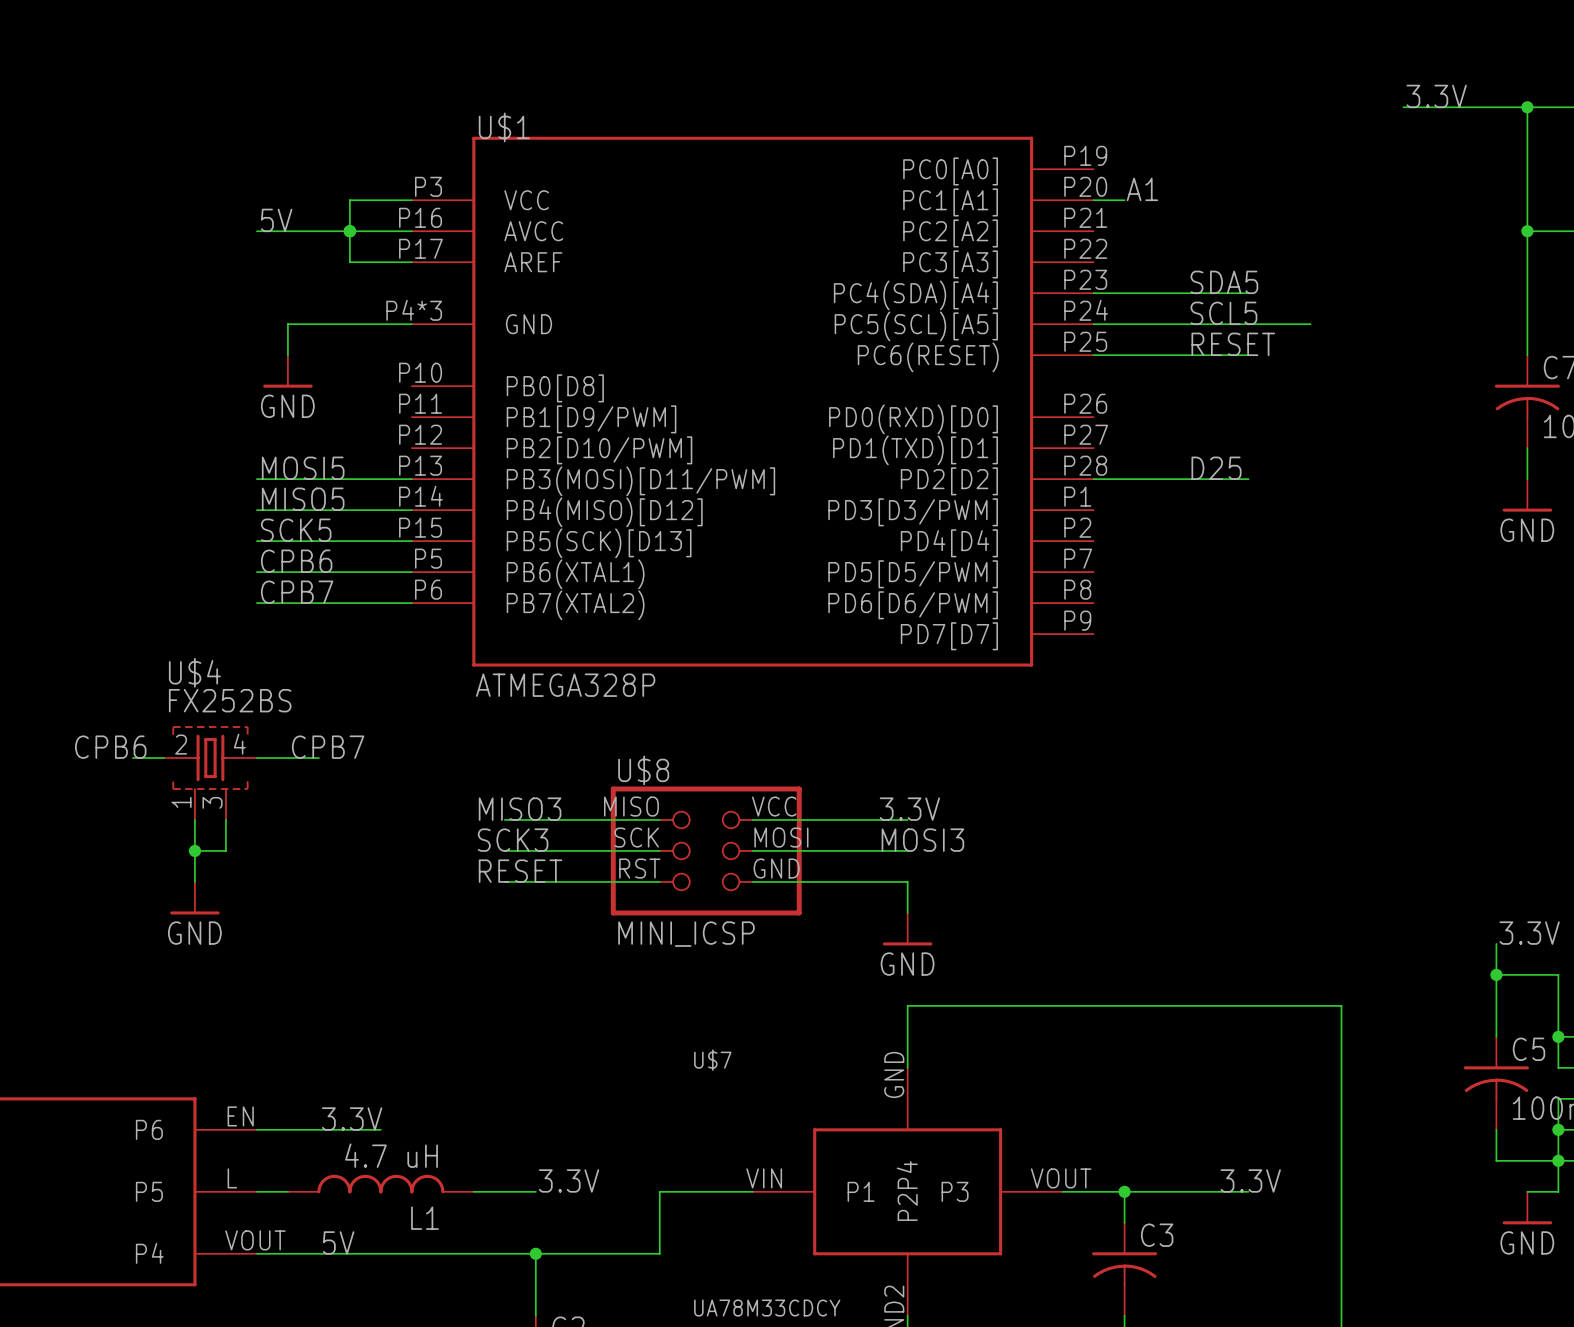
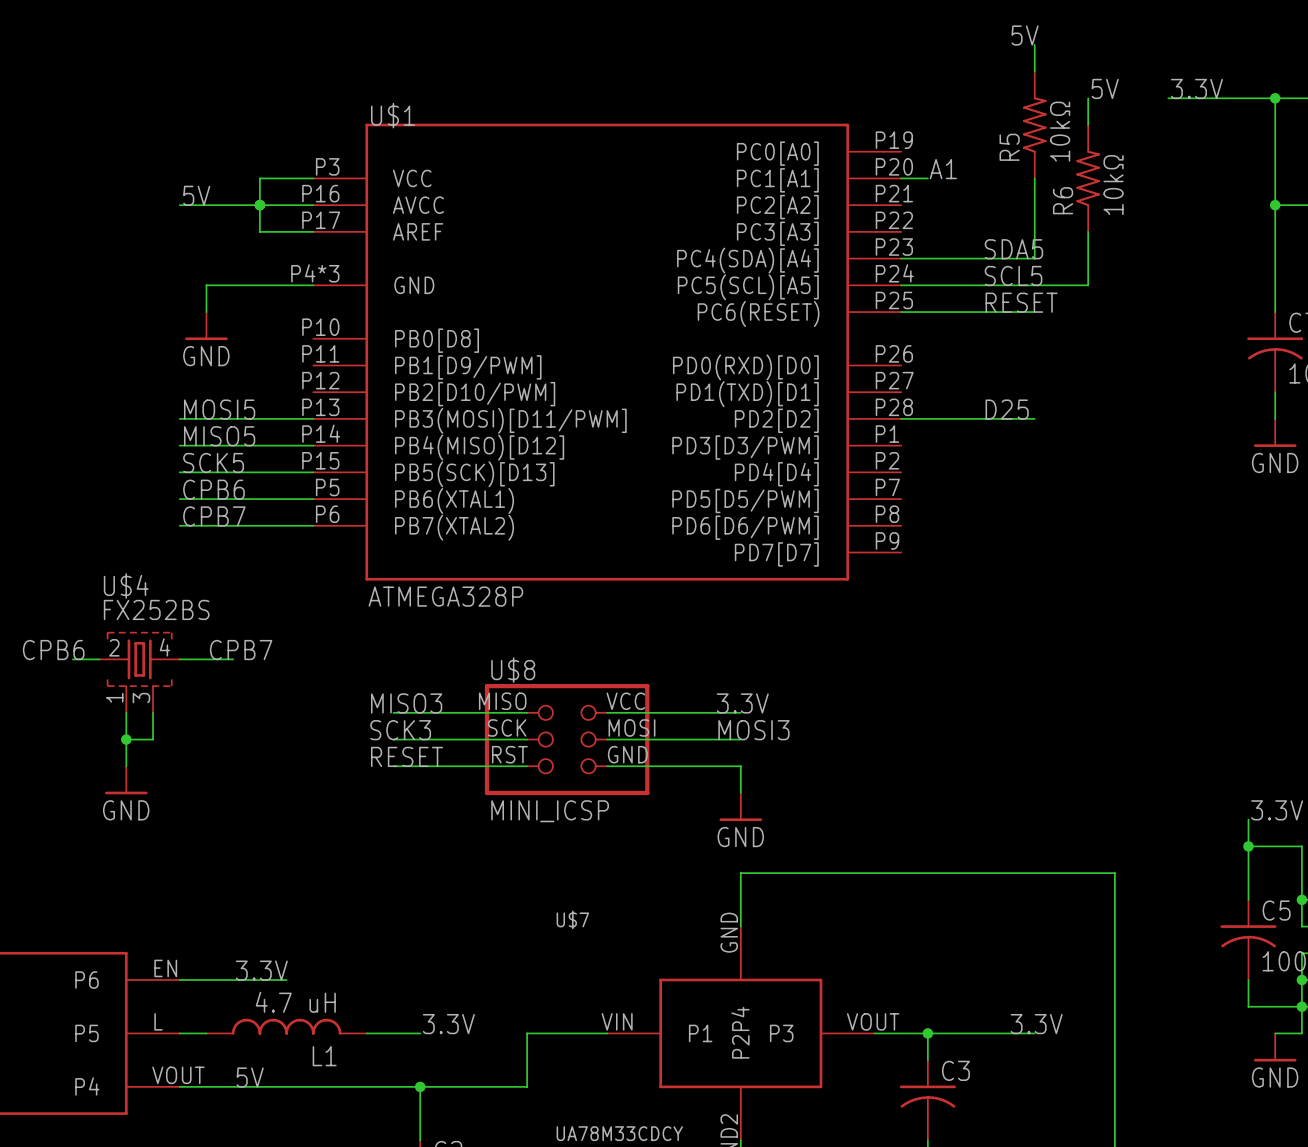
label: none -> 5V (1025, 35)
wire: none -> (1034, 44) (1034, 71)
label: none -> 5V (1105, 88)
wire: none -> (1088, 98) (1088, 125)
R5: none -> 10kΩ (1034, 125)
wire: none -> (1034, 178) (1034, 258)
R6: none -> 10kΩ (1088, 178)
wire: none -> (1088, 231) (1088, 285)

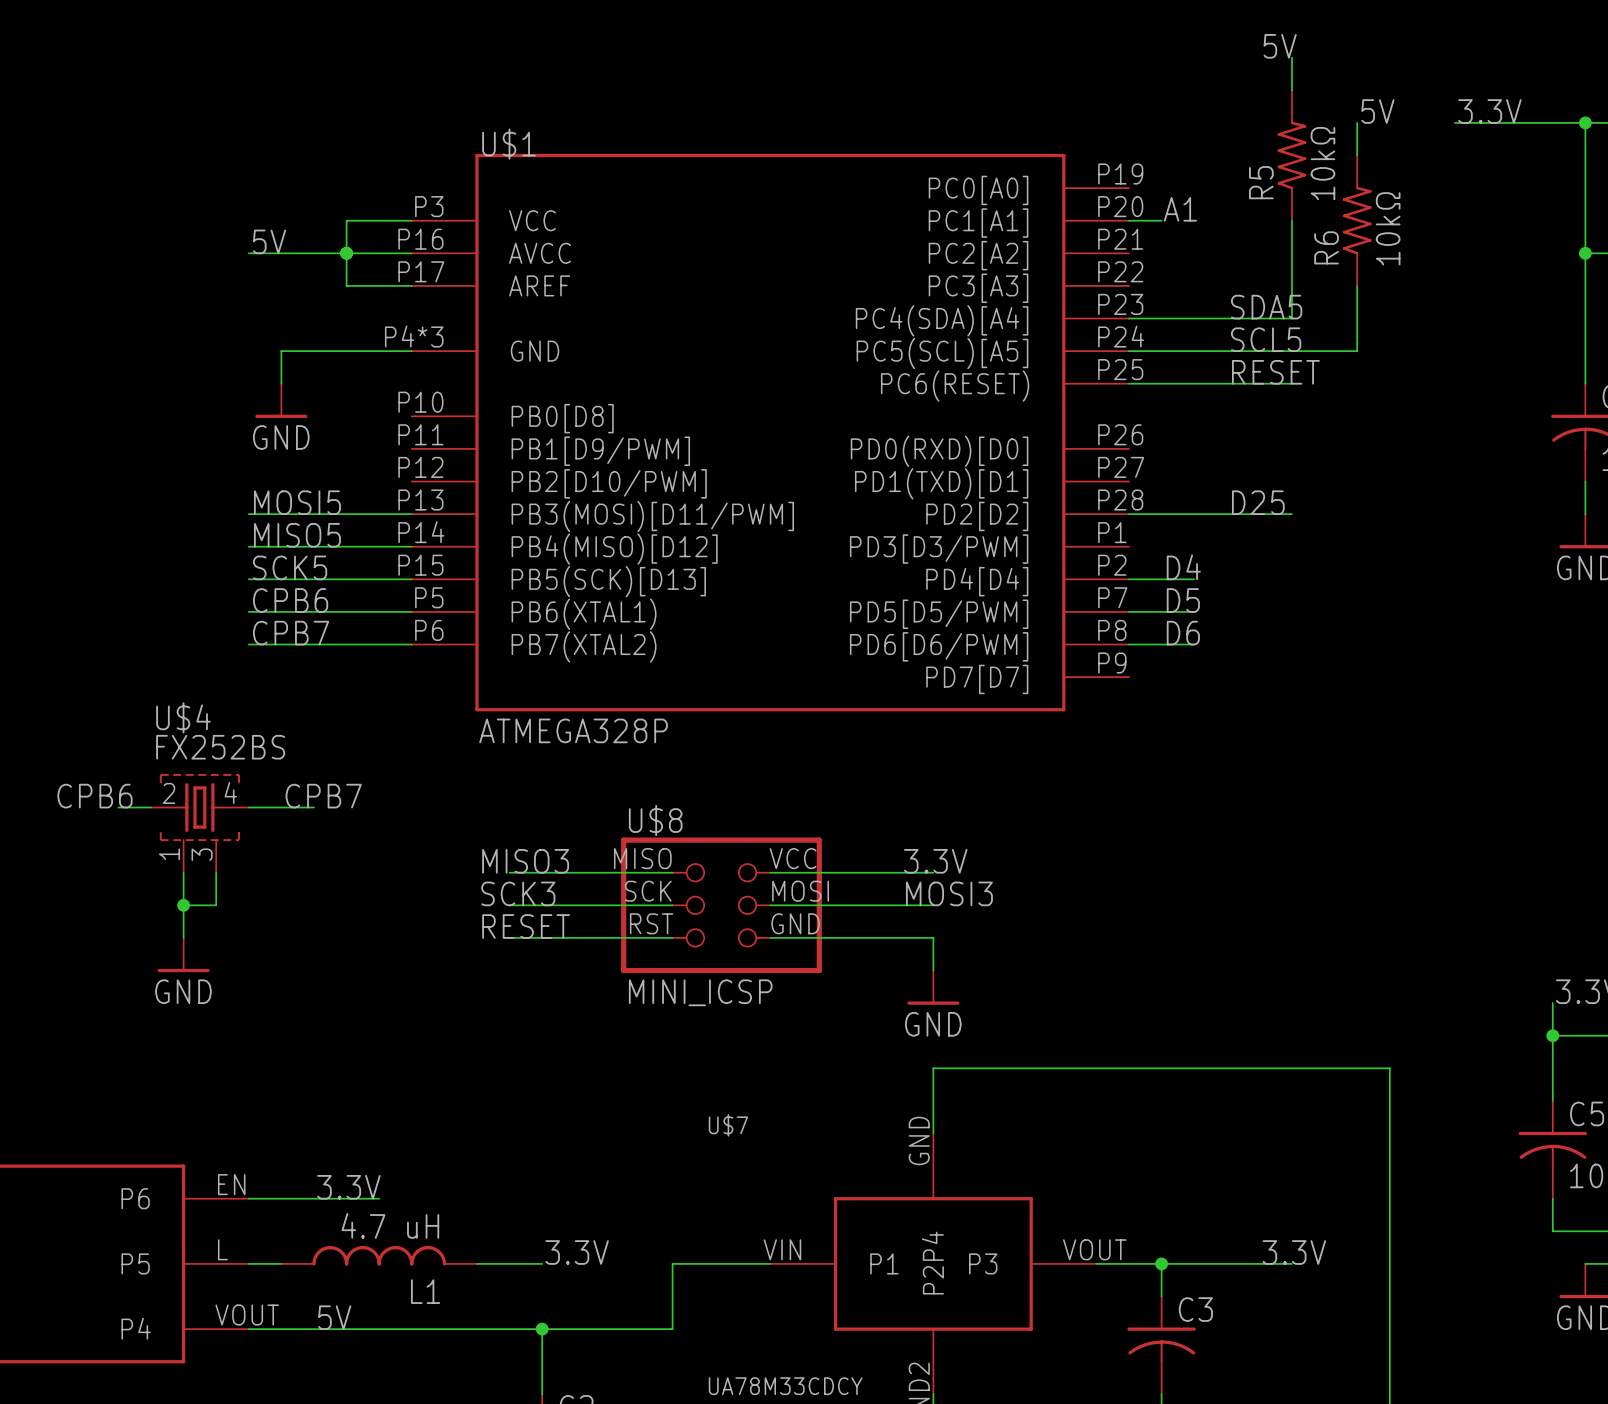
label: none -> D4 (1183, 567)
wire: none -> (1128, 579) (1194, 579)
label: none -> D5 (1183, 600)
wire: none -> (1128, 611) (1194, 611)
label: none -> D6 (1183, 633)
wire: none -> (1128, 644) (1194, 644)

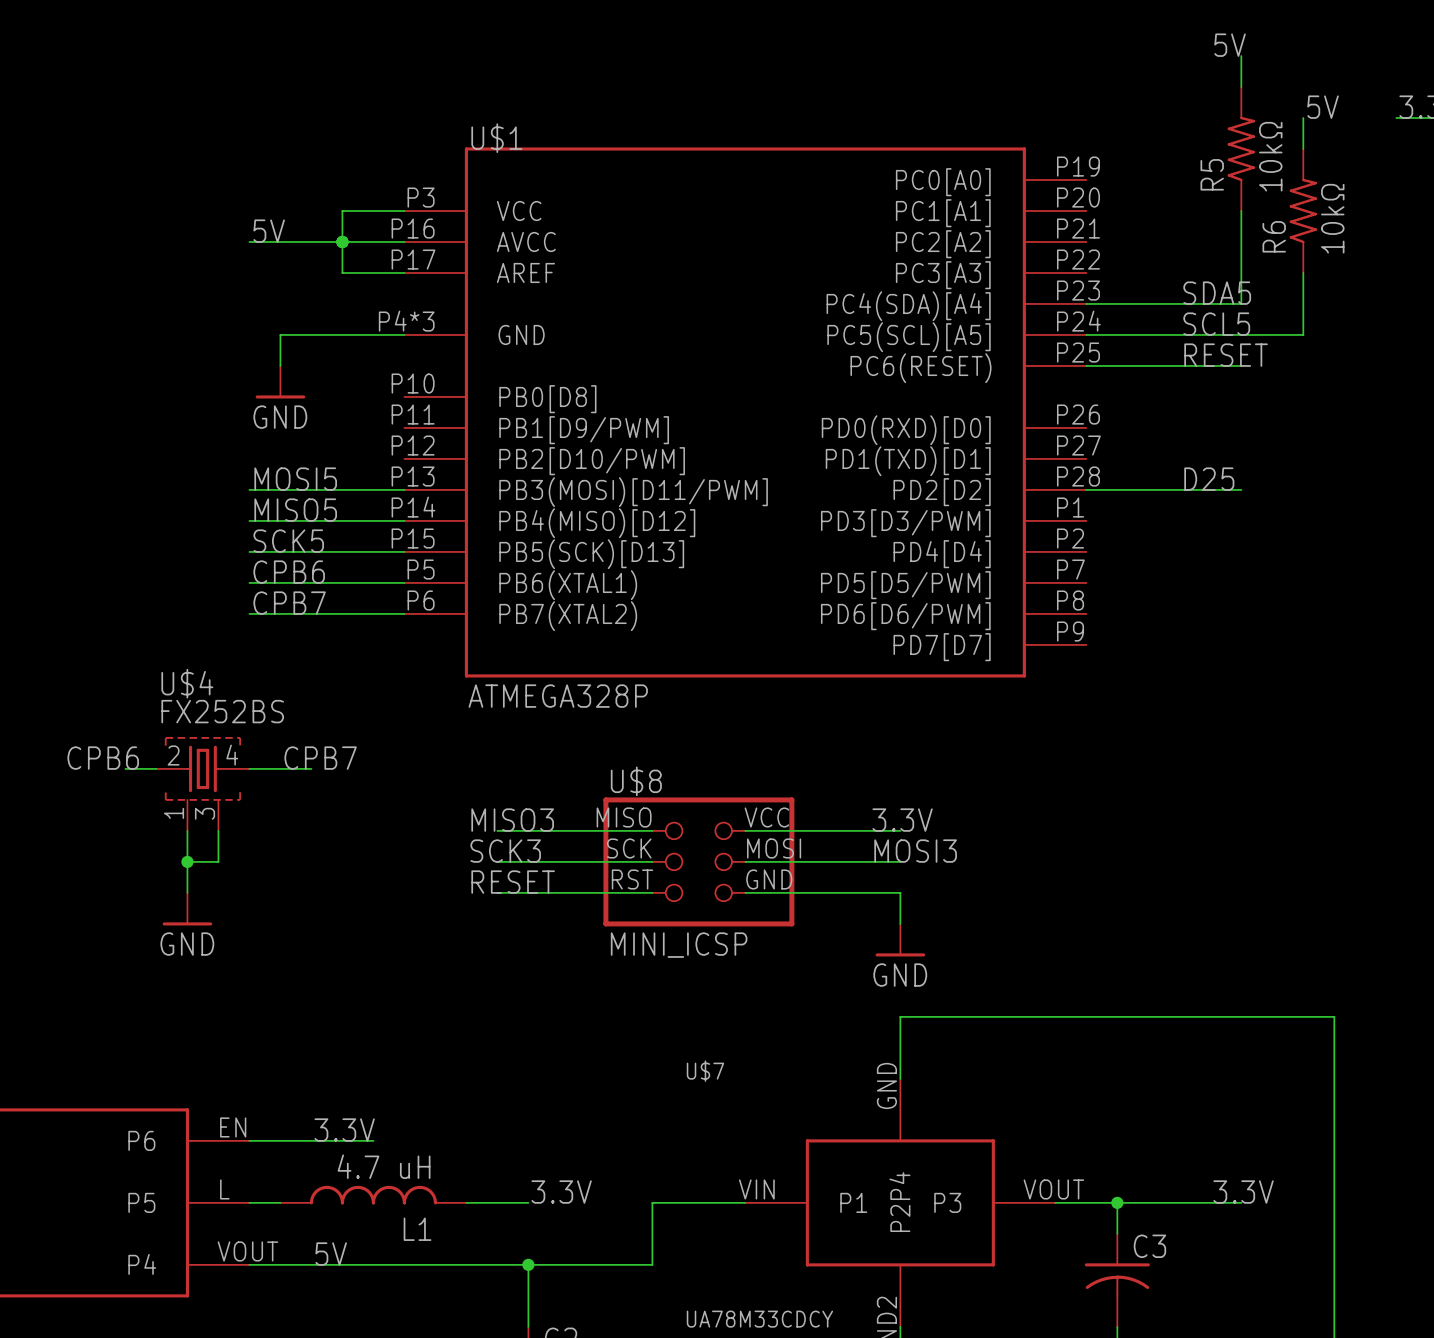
label: A1 (1180, 209) -> none
wire: (1128, 220) (1161, 220) -> none
label: D4 (1183, 567) -> none
wire: (1128, 579) (1194, 579) -> none
label: D5 (1183, 600) -> none
wire: (1128, 611) (1194, 611) -> none
label: D6 (1183, 633) -> none
wire: (1128, 644) (1194, 644) -> none

